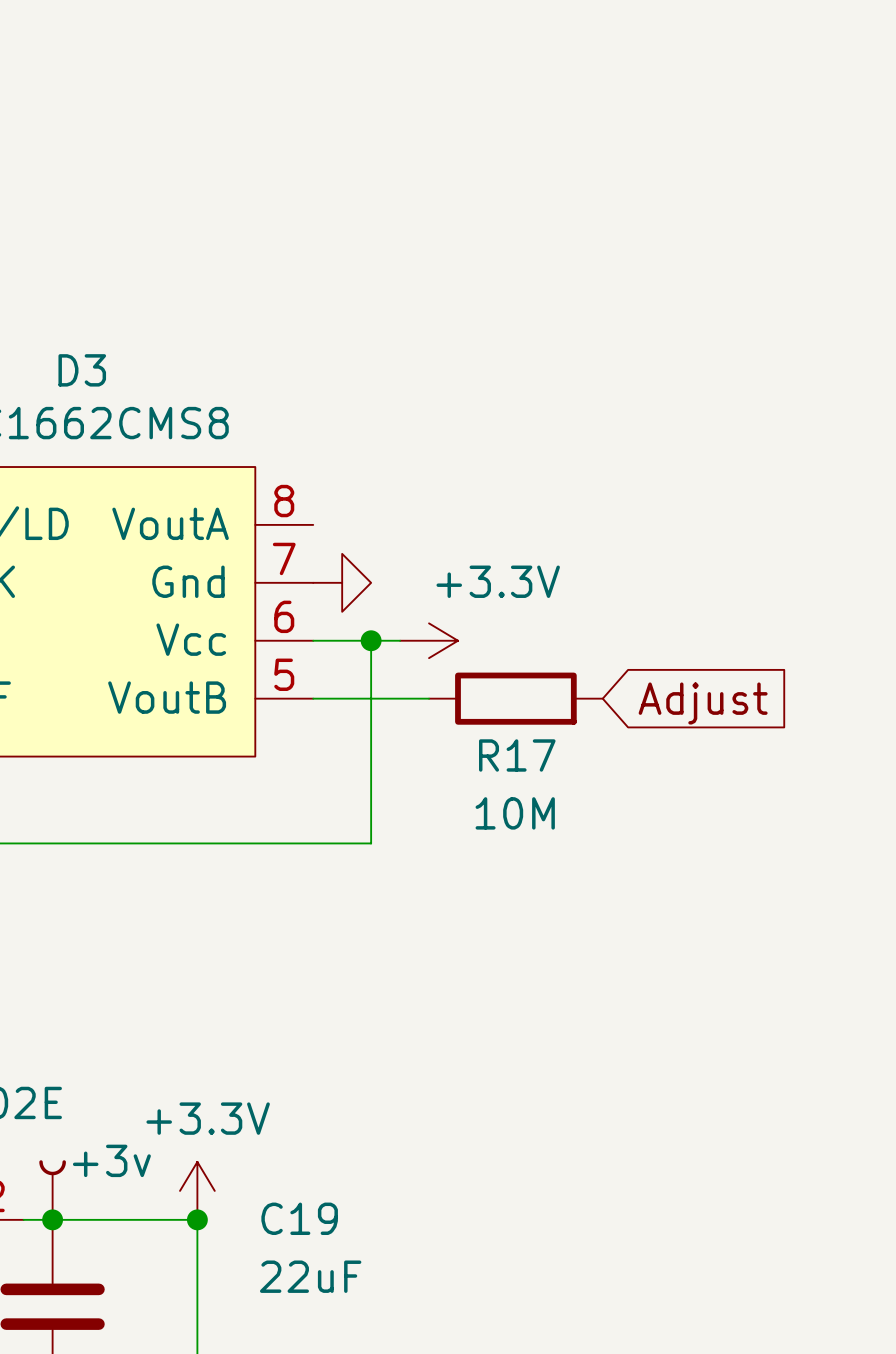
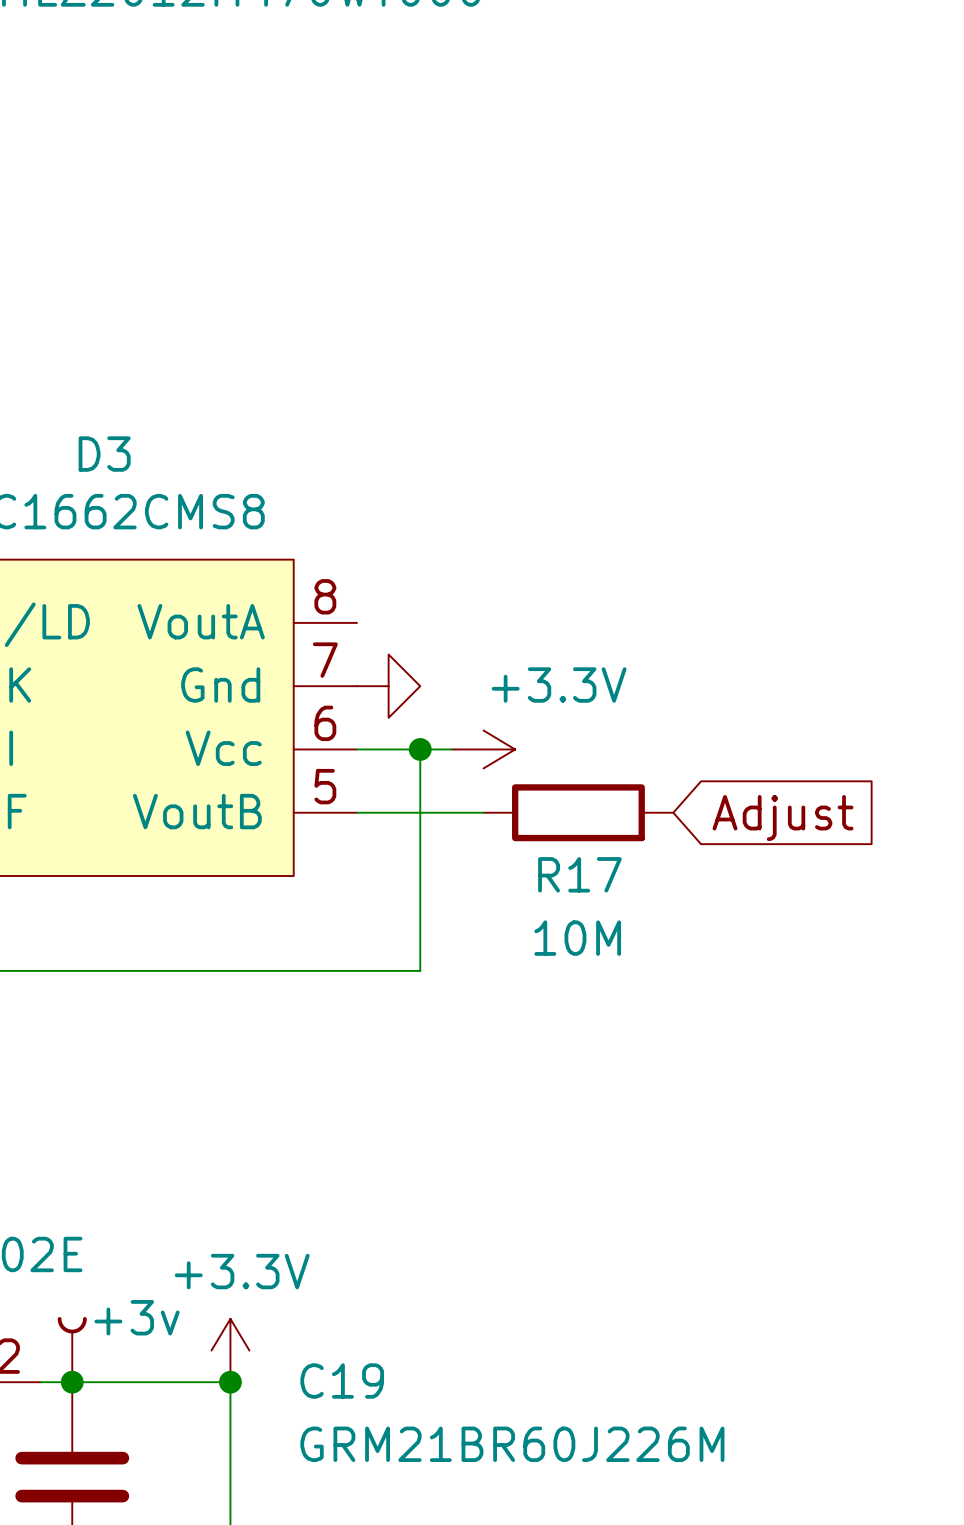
C19 value: 22uF (310, 1276) -> GRM21BR60J226M (512, 1444)

